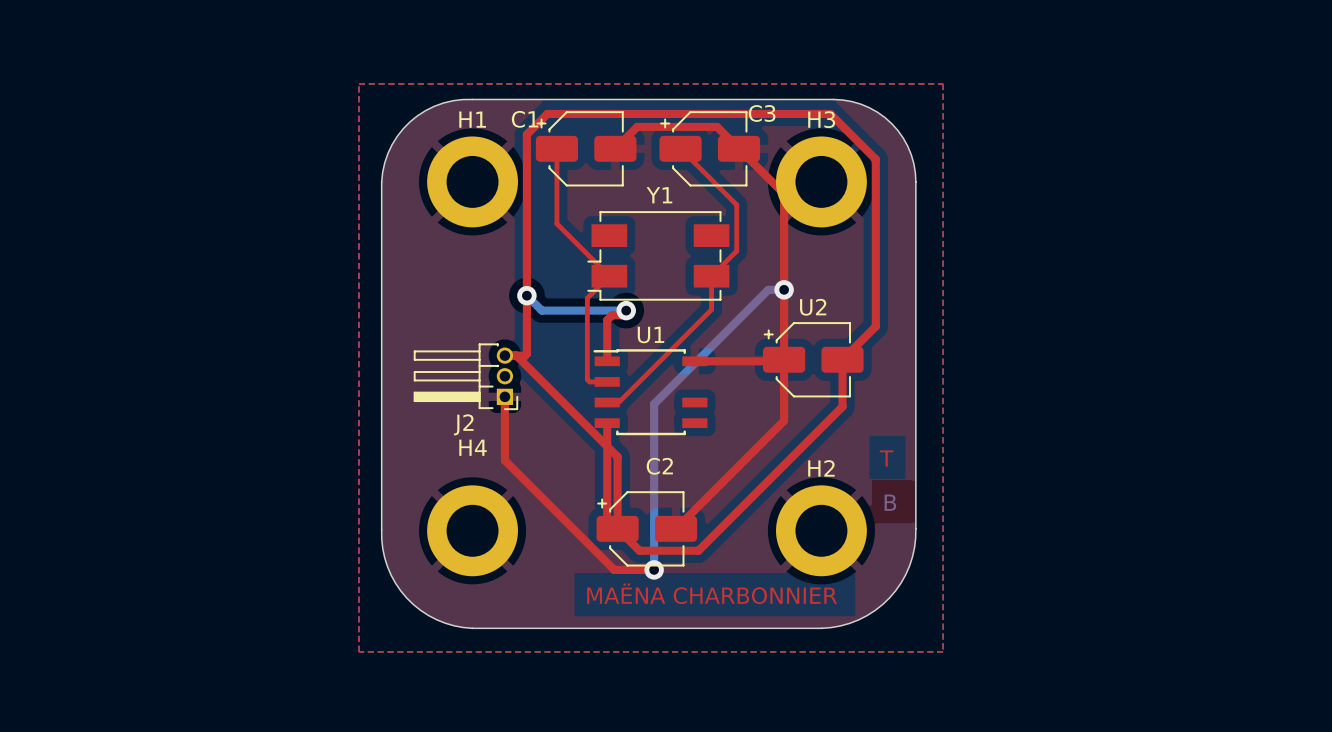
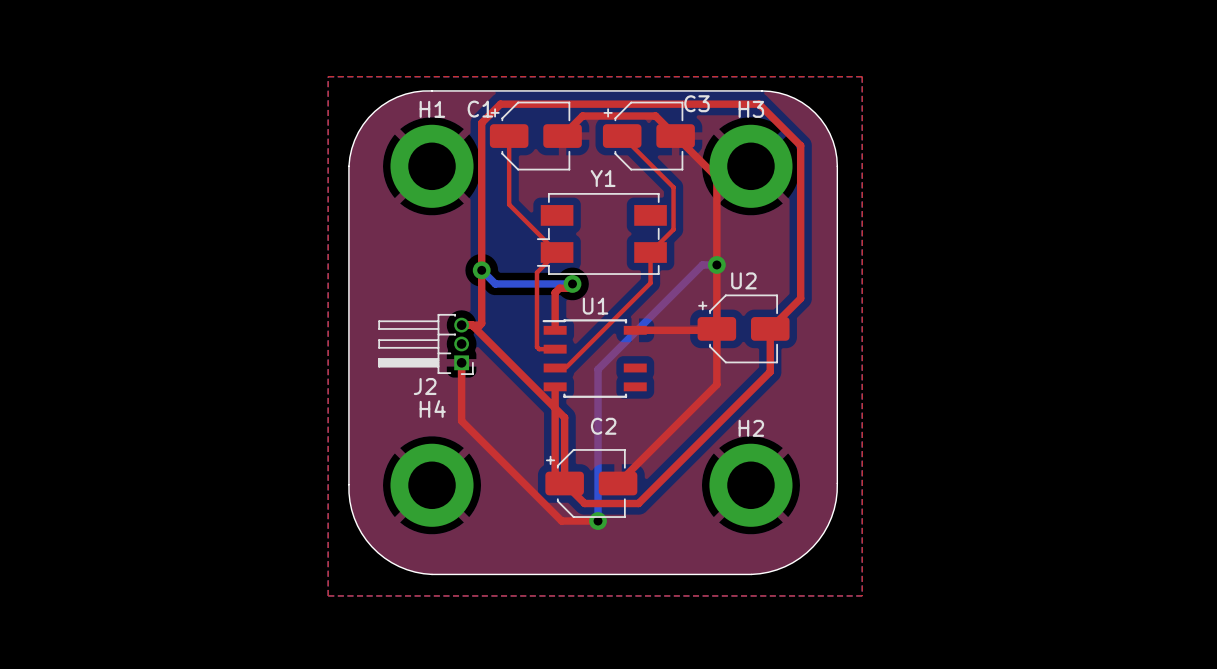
text: T (886, 458) -> none
text: B (890, 502) -> none
text: MAËNA CHARBONNIER (712, 593) -> none

